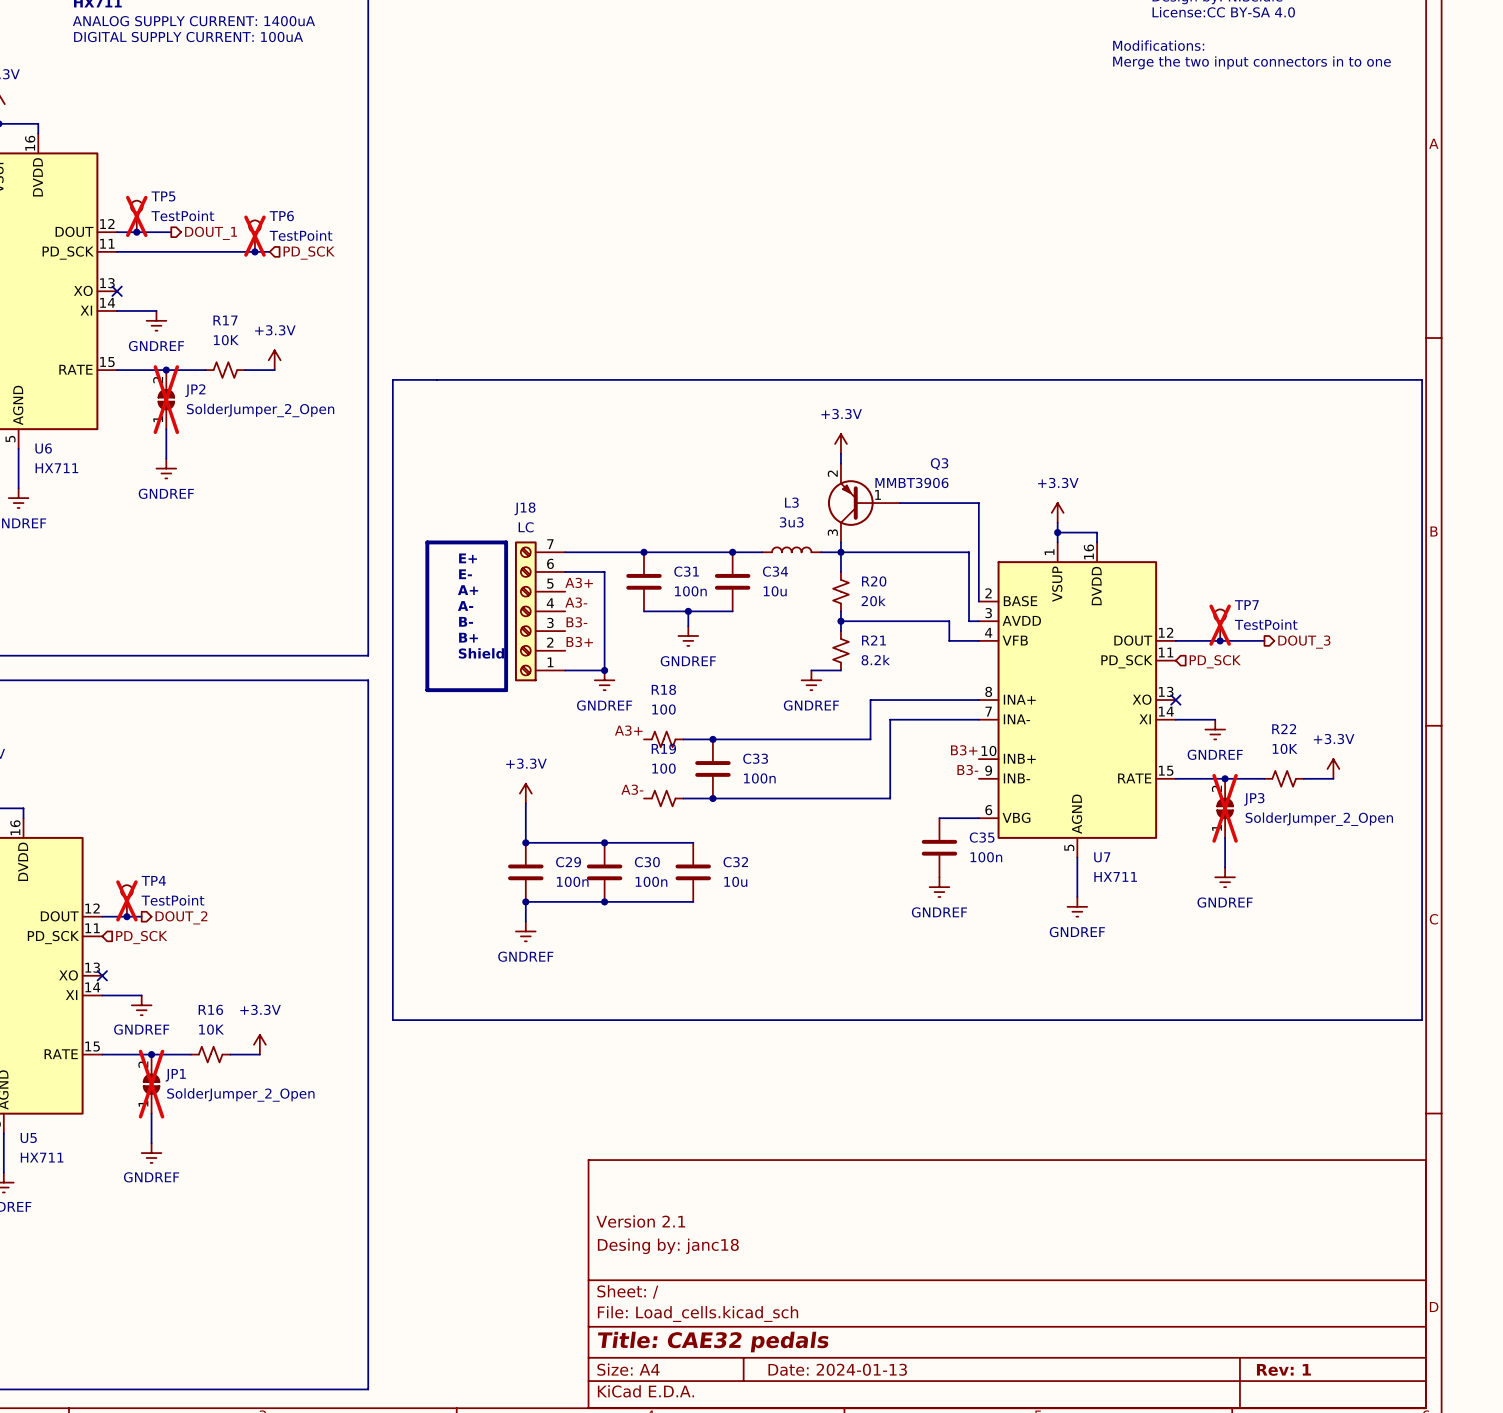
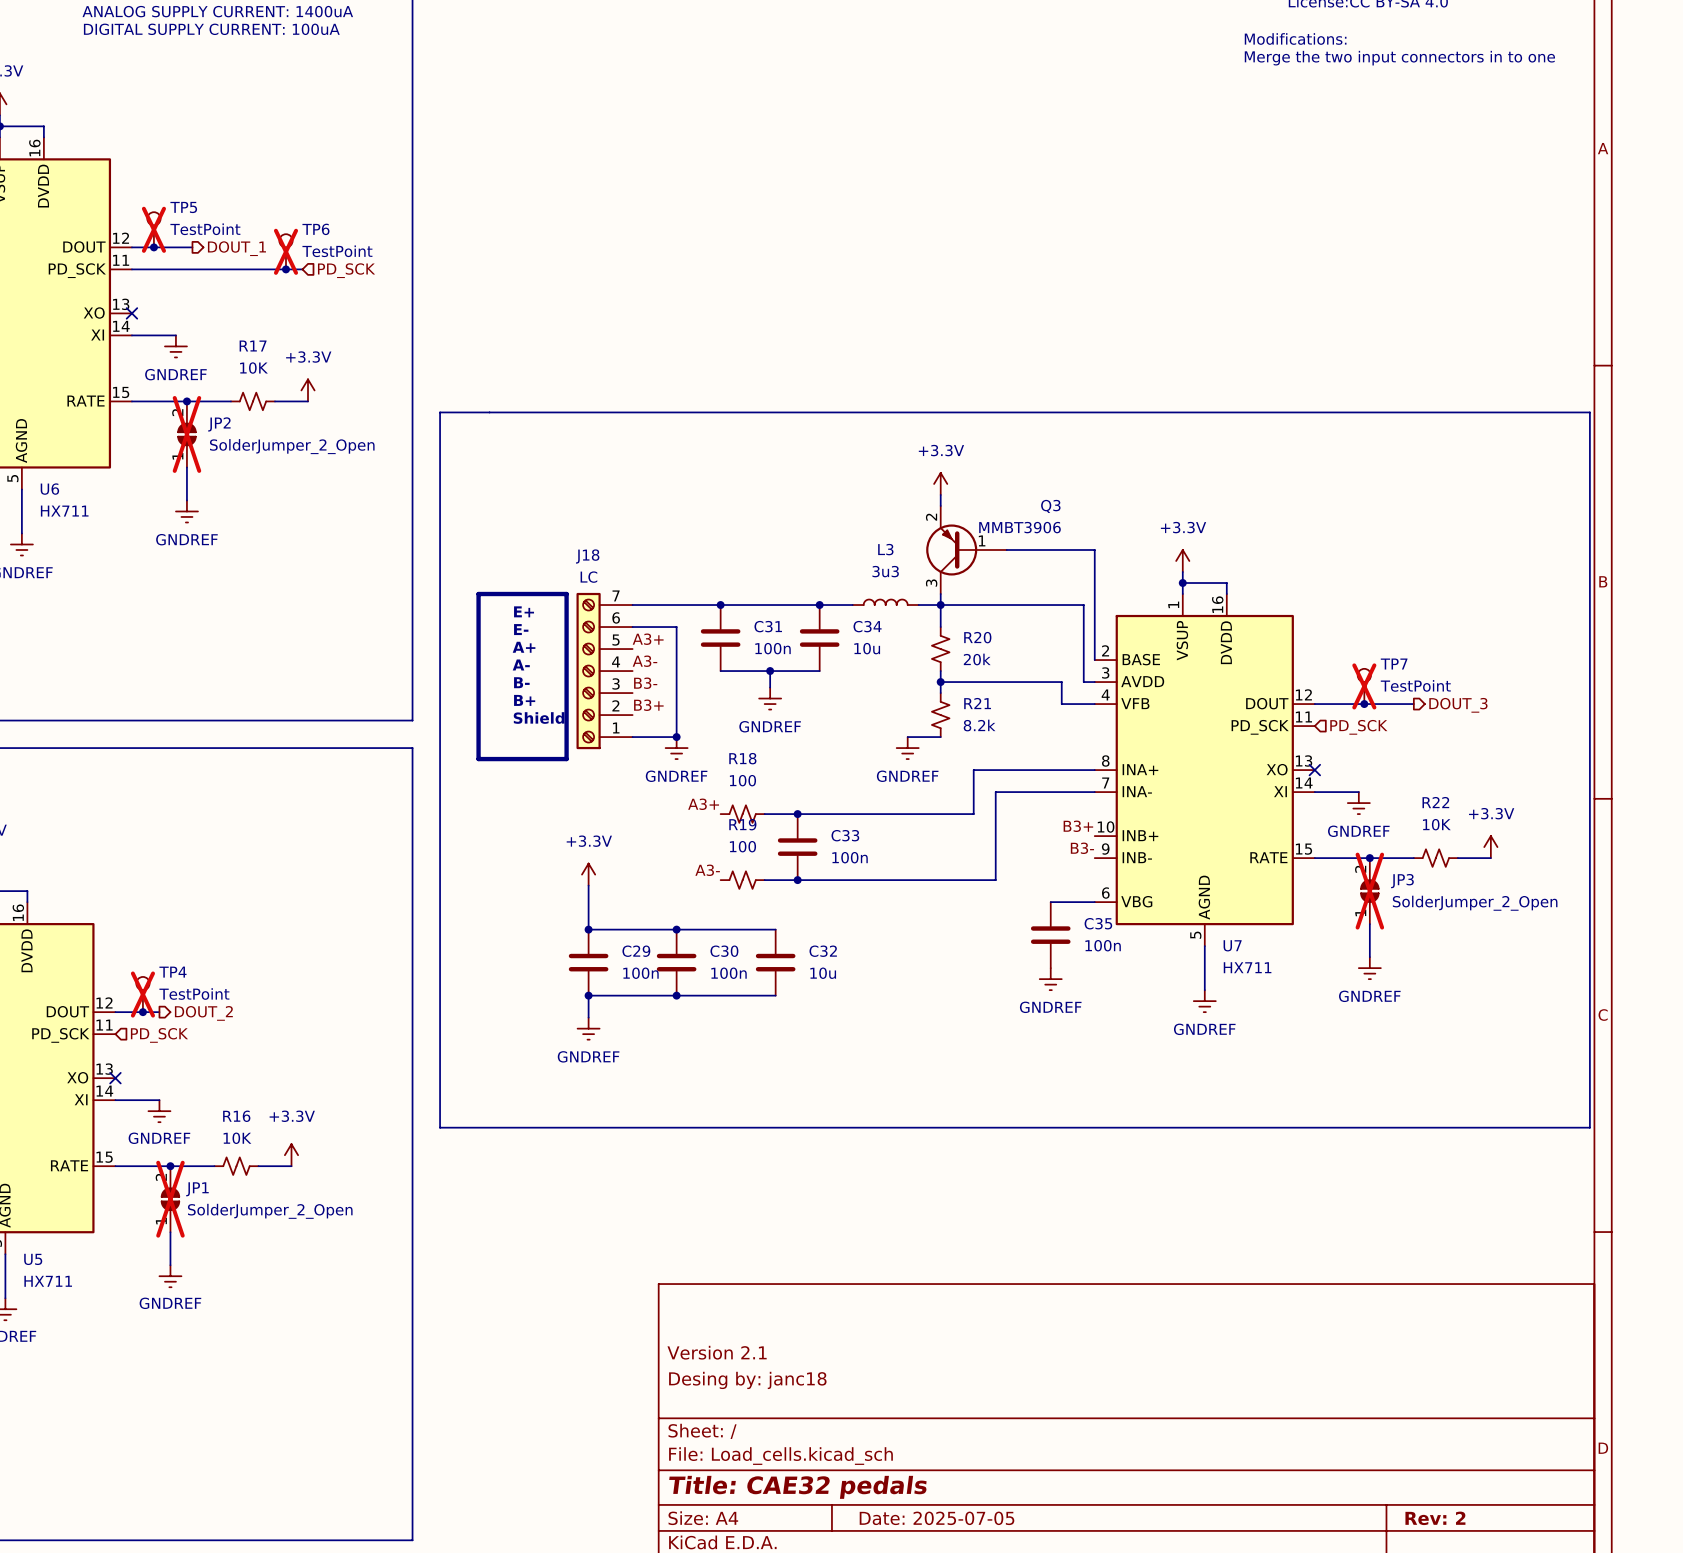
title block: Date: 2024-01-13 (837, 1369) -> Date: 2025-07-05 (936, 1518)
title block: Rev: 1 (1283, 1369) -> Rev: 2 (1435, 1518)

